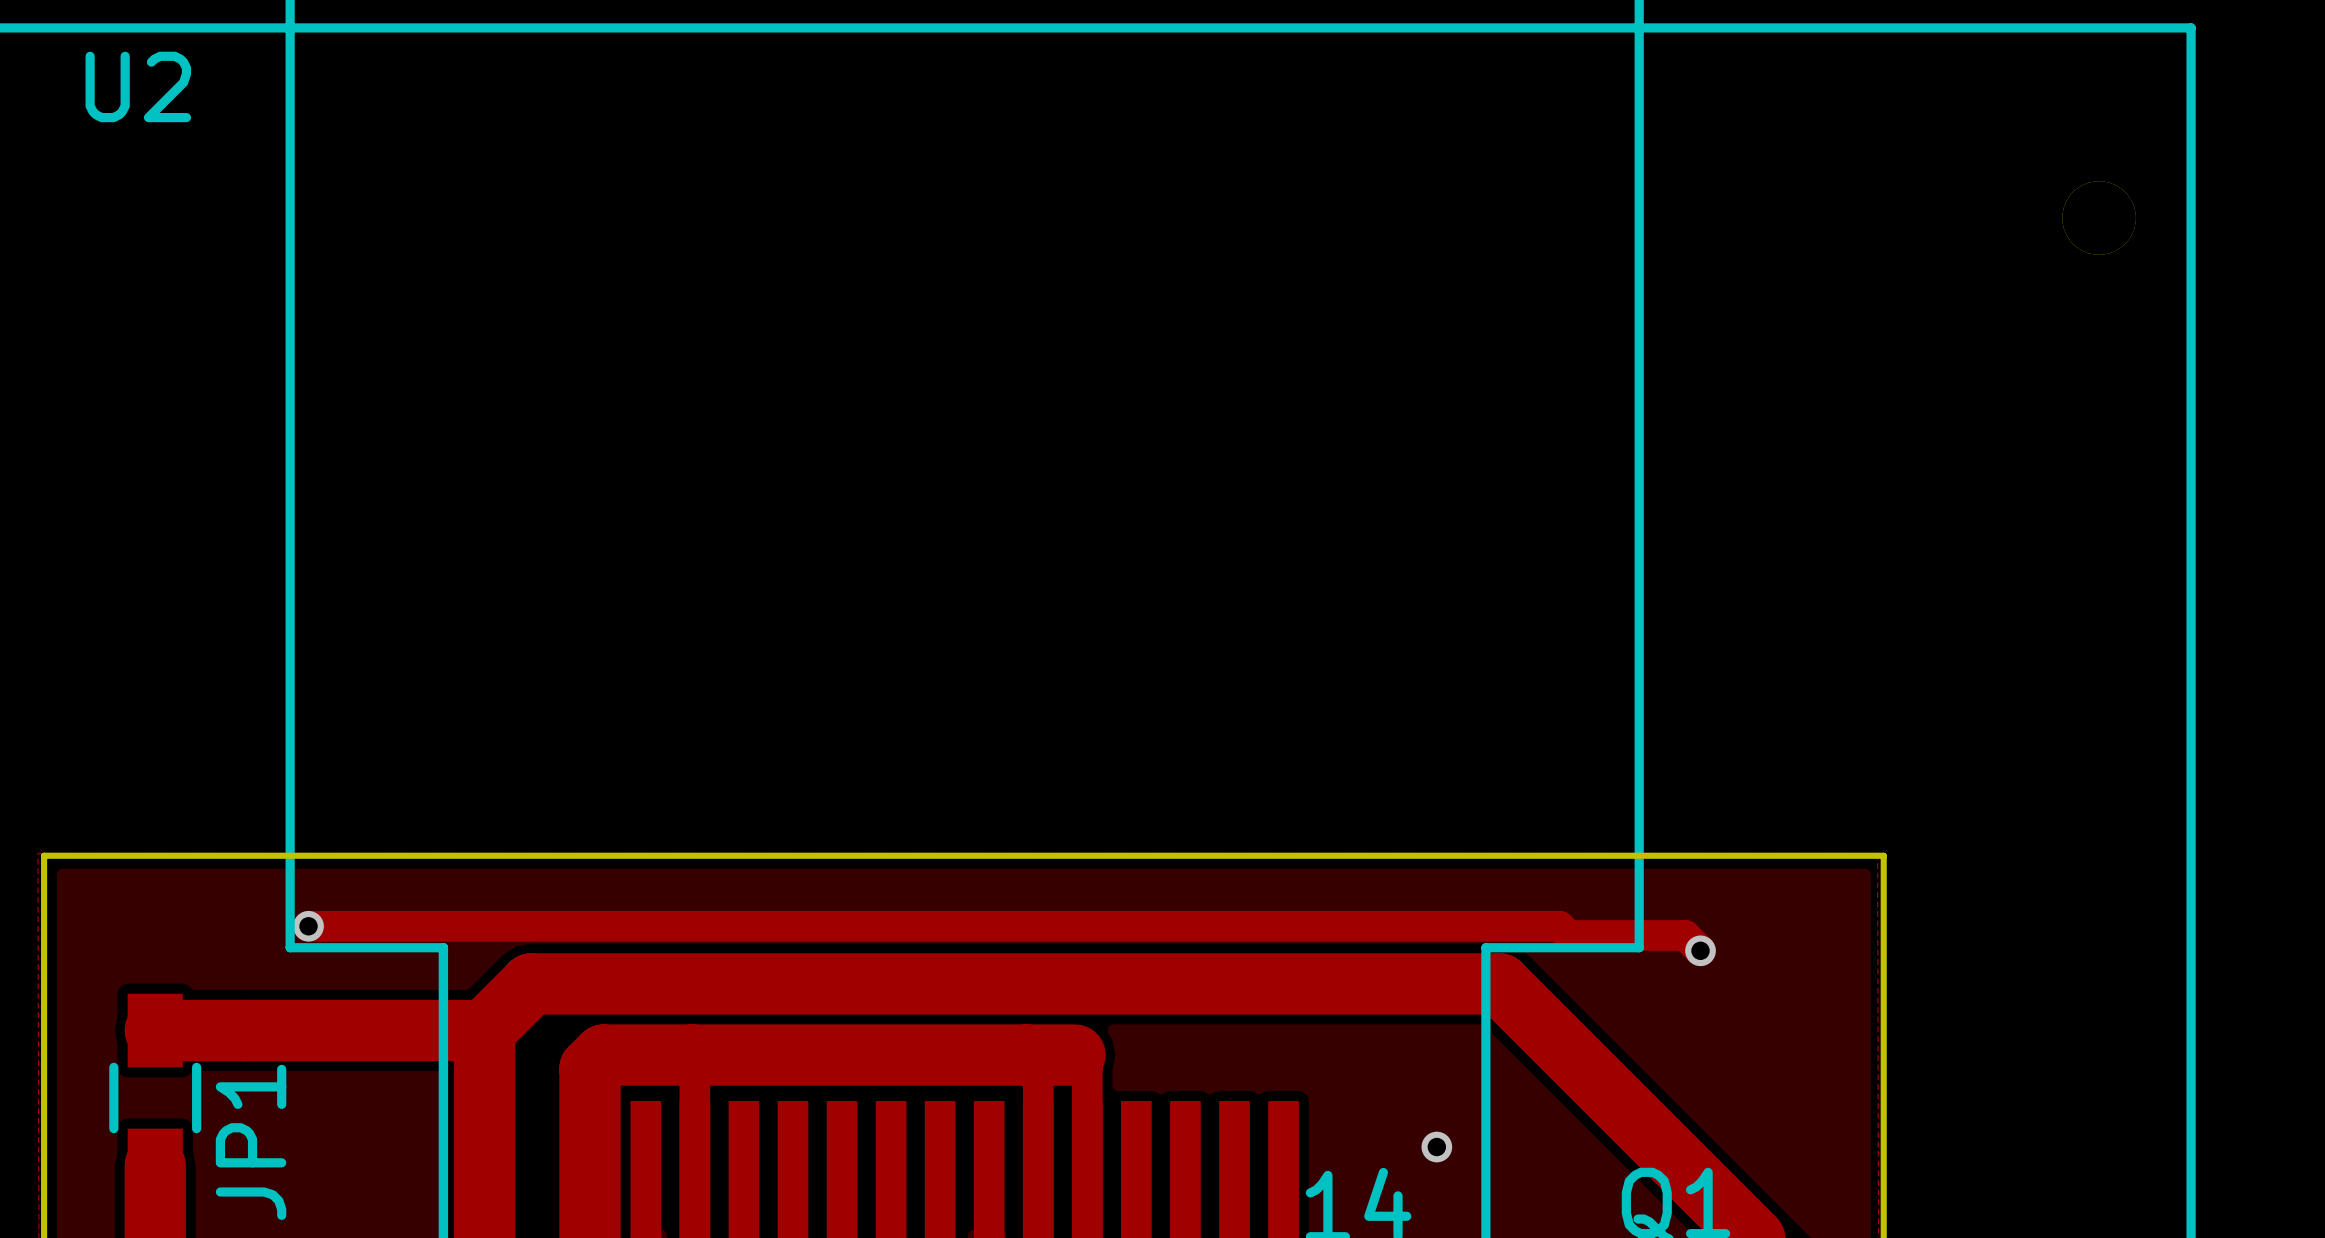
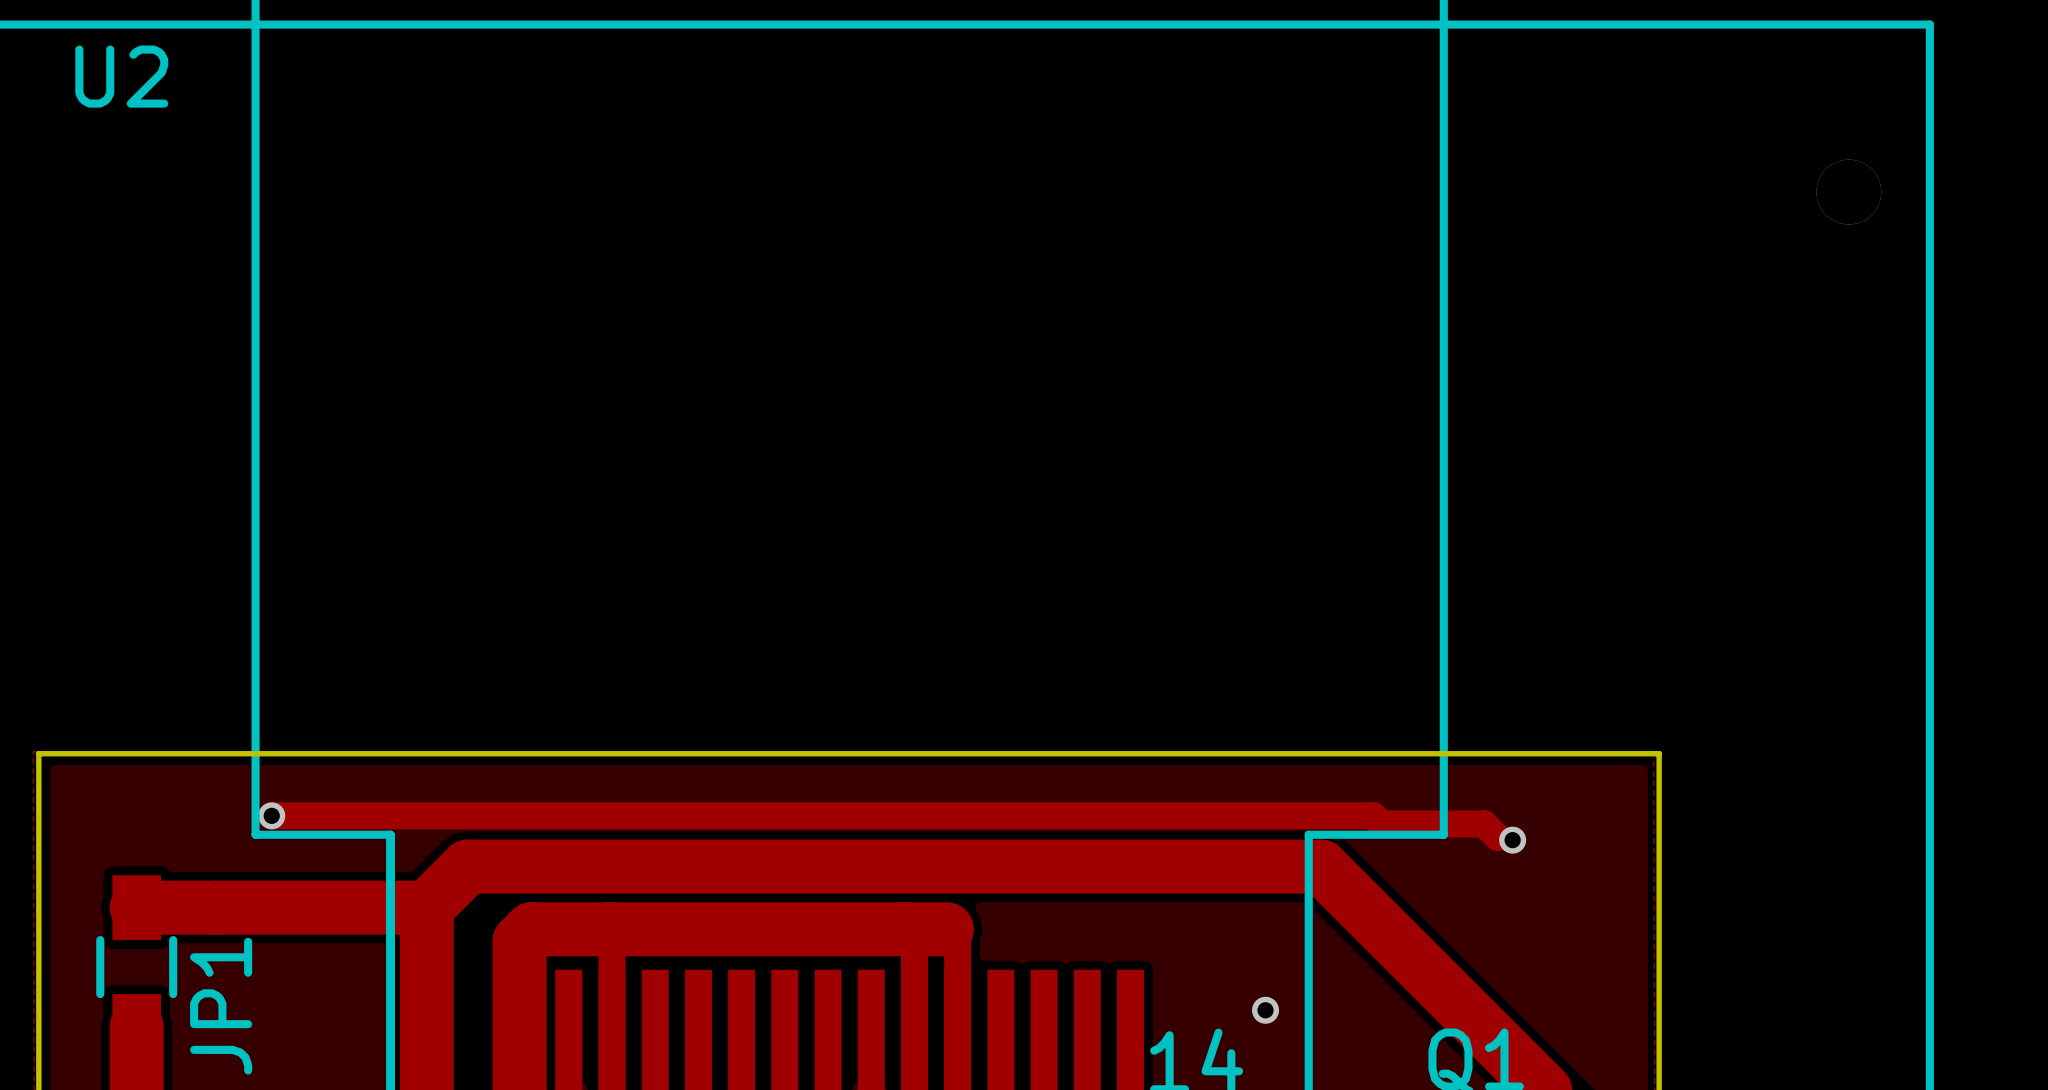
via position: (1700, 950) -> (1512, 840)

